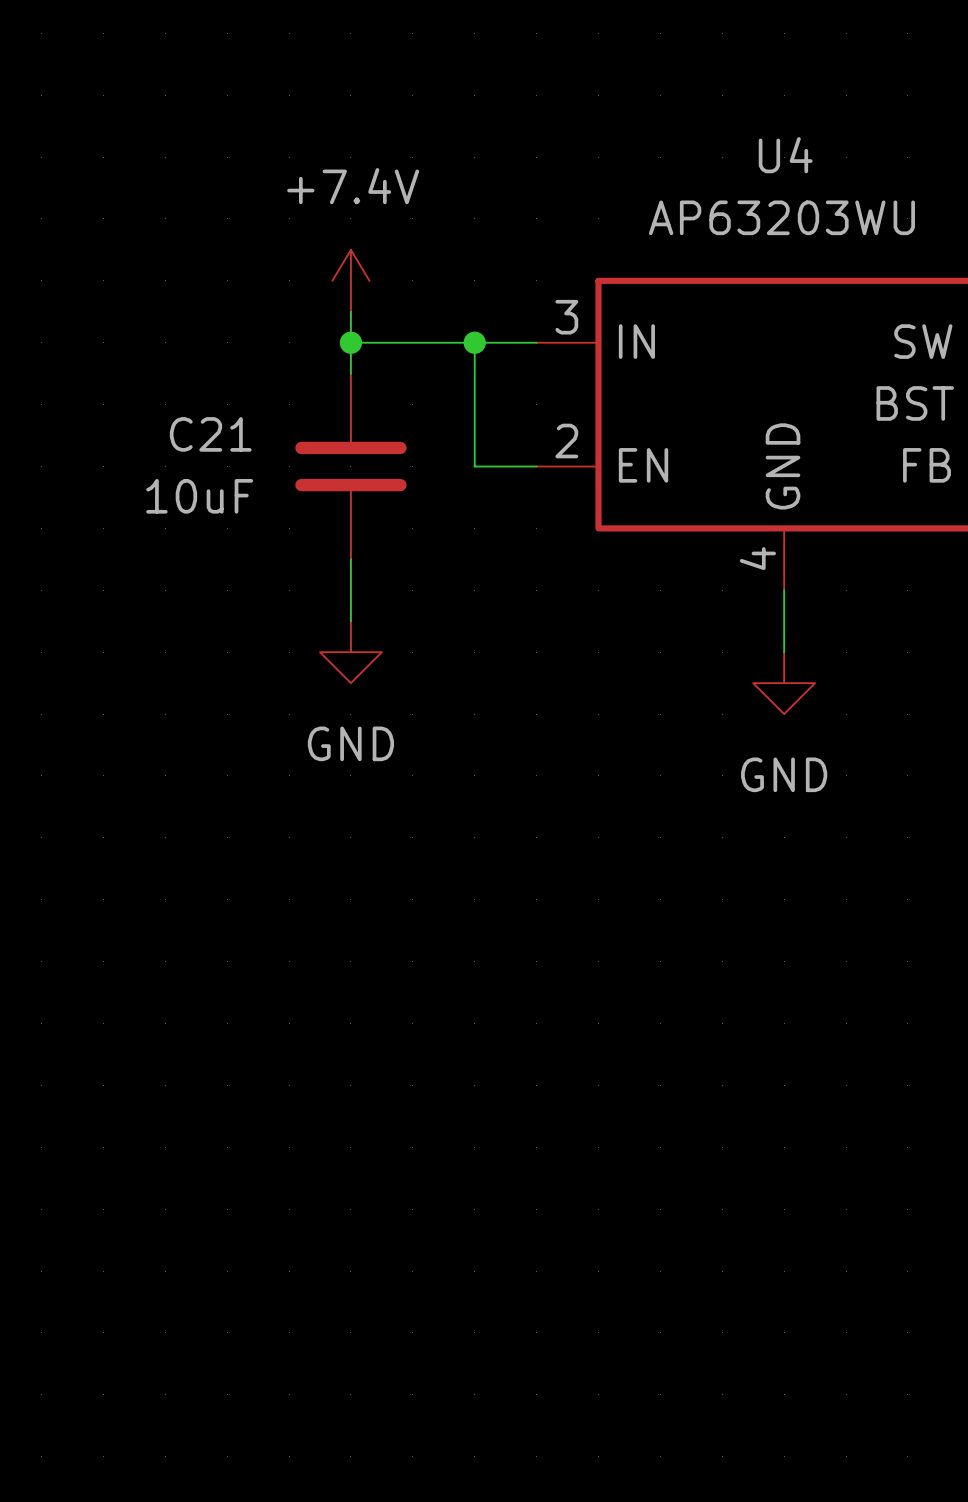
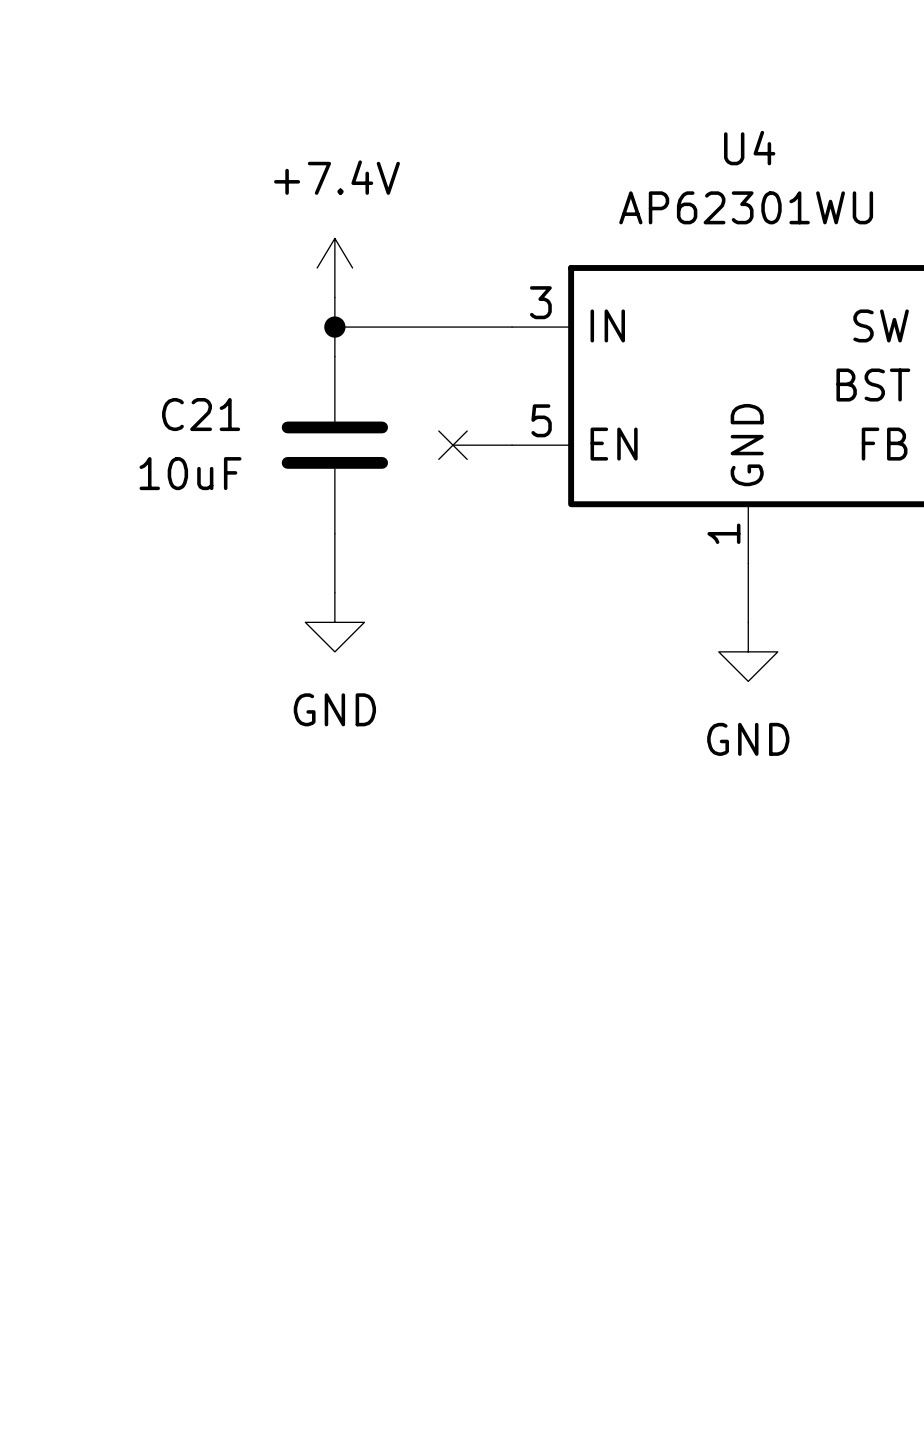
U4 value: AP63203WU (781, 217) -> AP62301WU (746, 207)
wire: (474, 342) (474, 466) -> none
junction: (474, 342) -> none
U4 pin number: 2 (566, 440) -> 5 (541, 420)
no-connect mark: none -> (453, 445)
U4 pin number: 4 (757, 558) -> 1 (723, 533)

